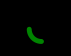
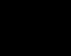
bottom track: (29, 29) (32, 37) (41, 41) -> none

